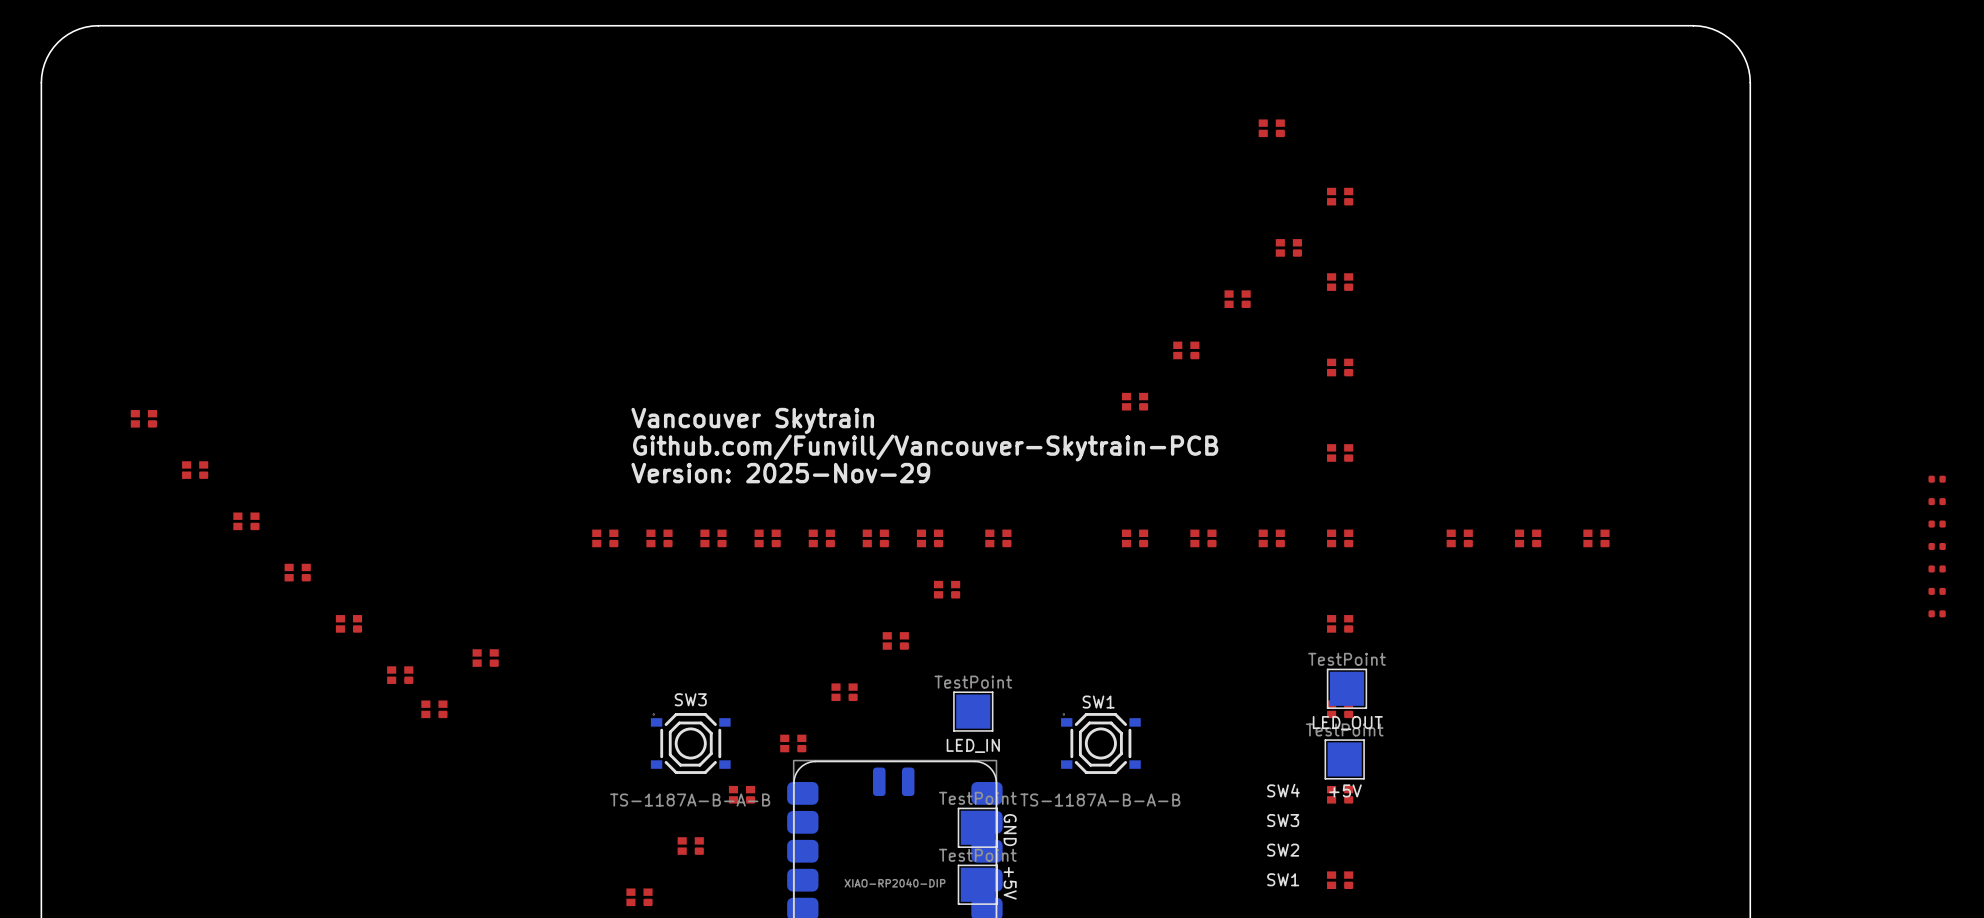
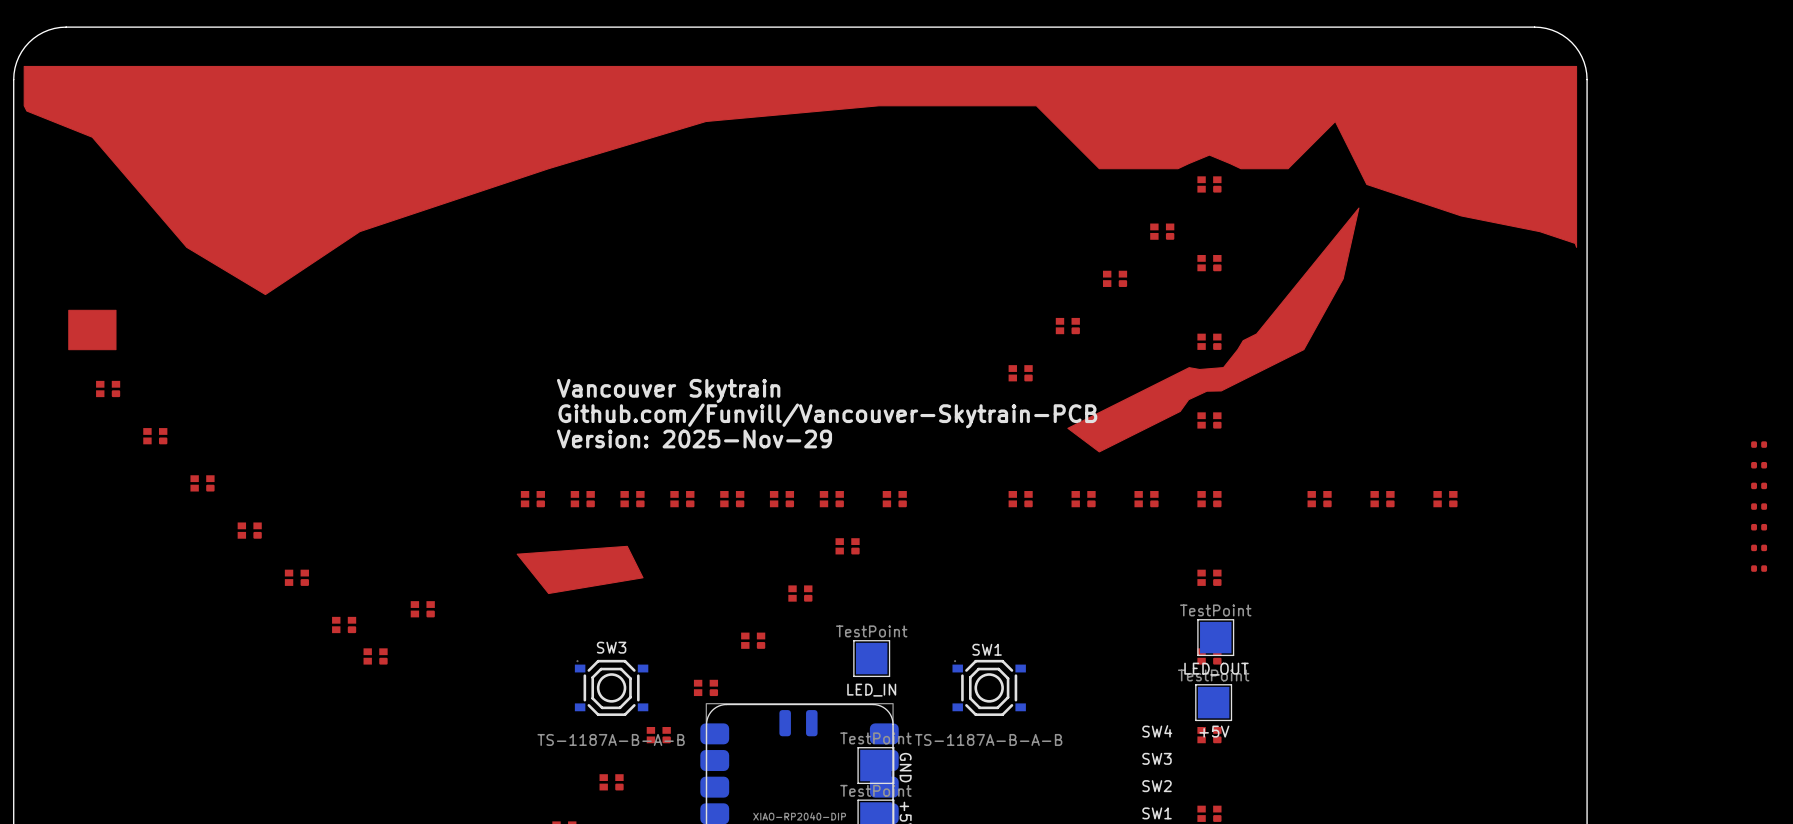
drawing: none -> [23, 65, 1578, 453]
drawing: none -> [68, 309, 117, 351]
drawing: none -> [516, 545, 644, 595]

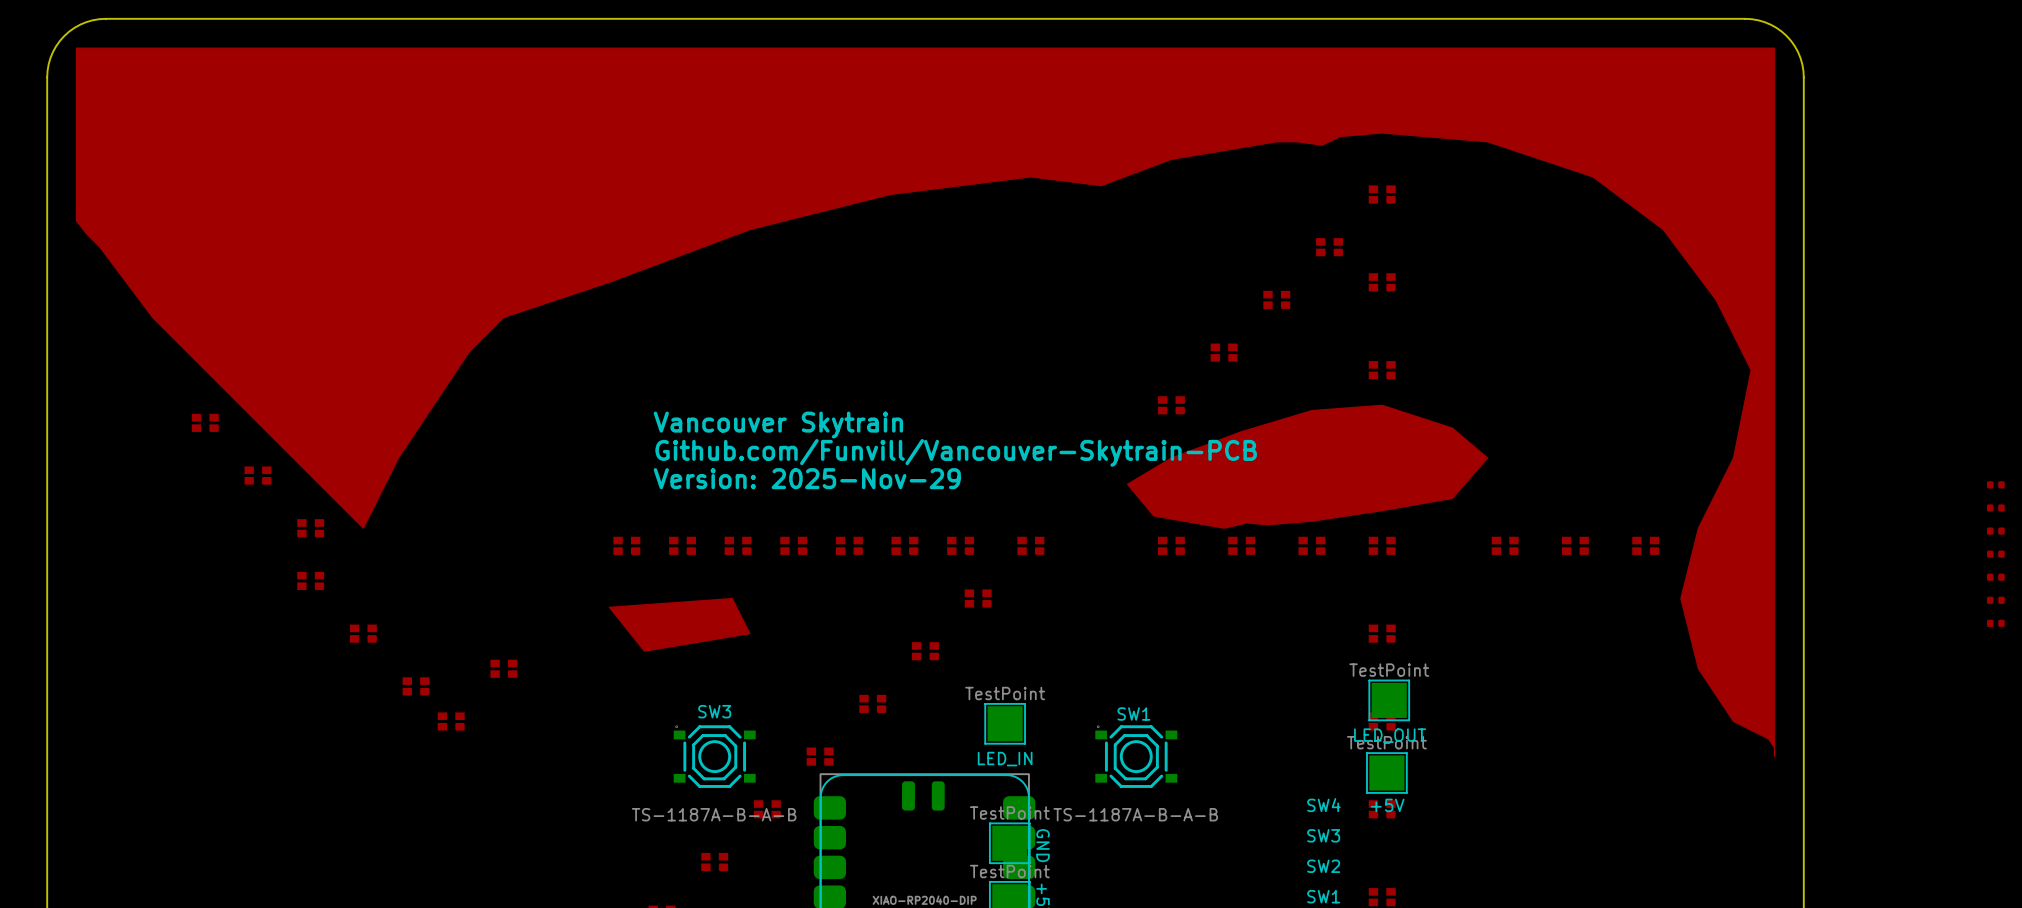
drawing: none -> [75, 47, 1776, 758]
drawing: [23, 65, 1578, 453] -> none
drawing: [68, 309, 117, 351] -> none
part: (108, 388) -> none
part: none -> (205, 422)
part: (155, 436) -> none
part: none -> (257, 475)
part: (202, 483) -> none
part: none -> (310, 528)

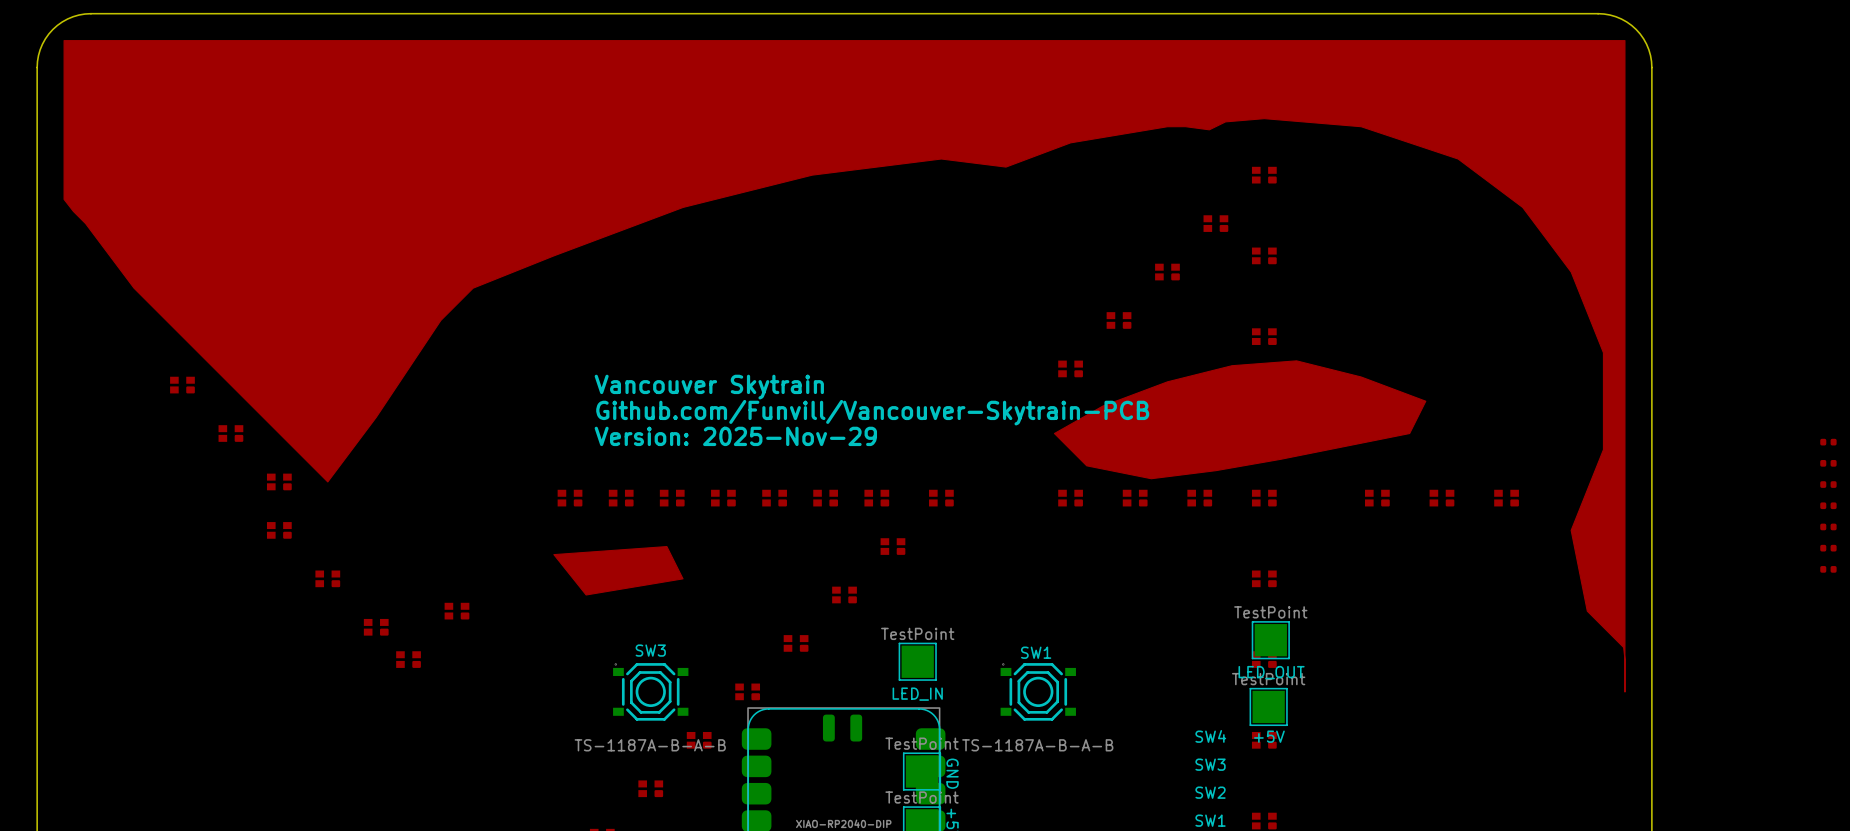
drawing shape: [75, 47, 1776, 758] -> [63, 40, 1626, 693]
drawing: none -> [1053, 360, 1427, 480]
drawing: [1126, 404, 1489, 529] -> none

